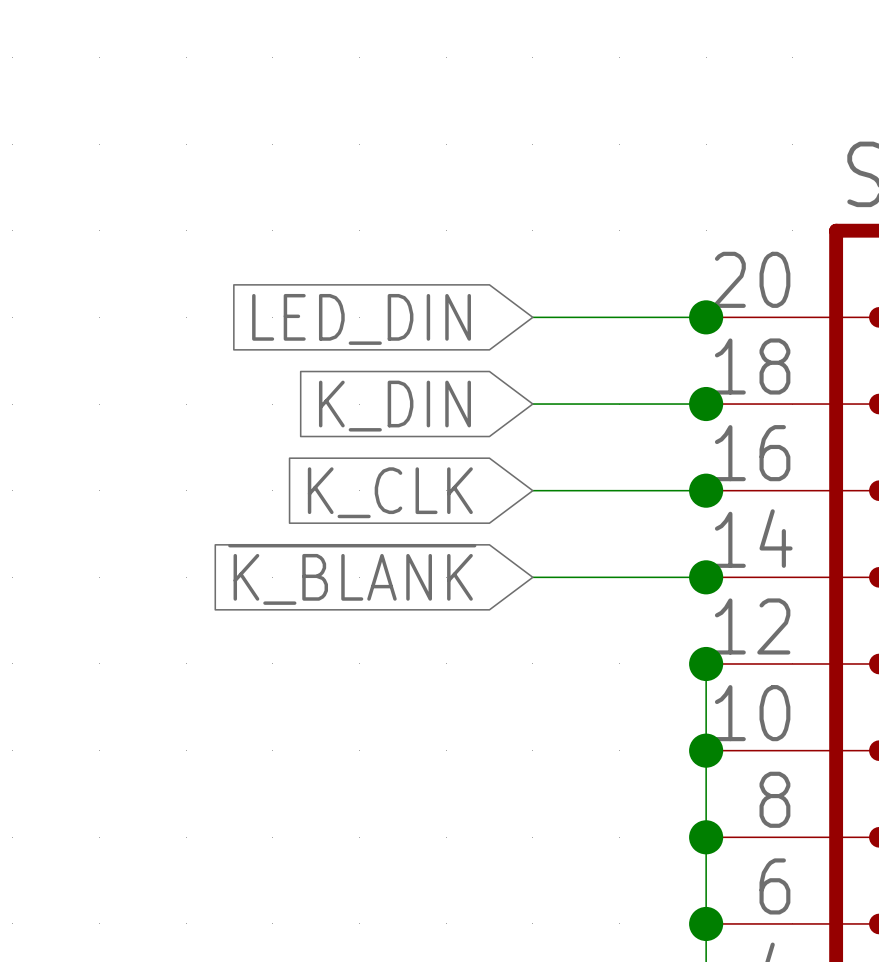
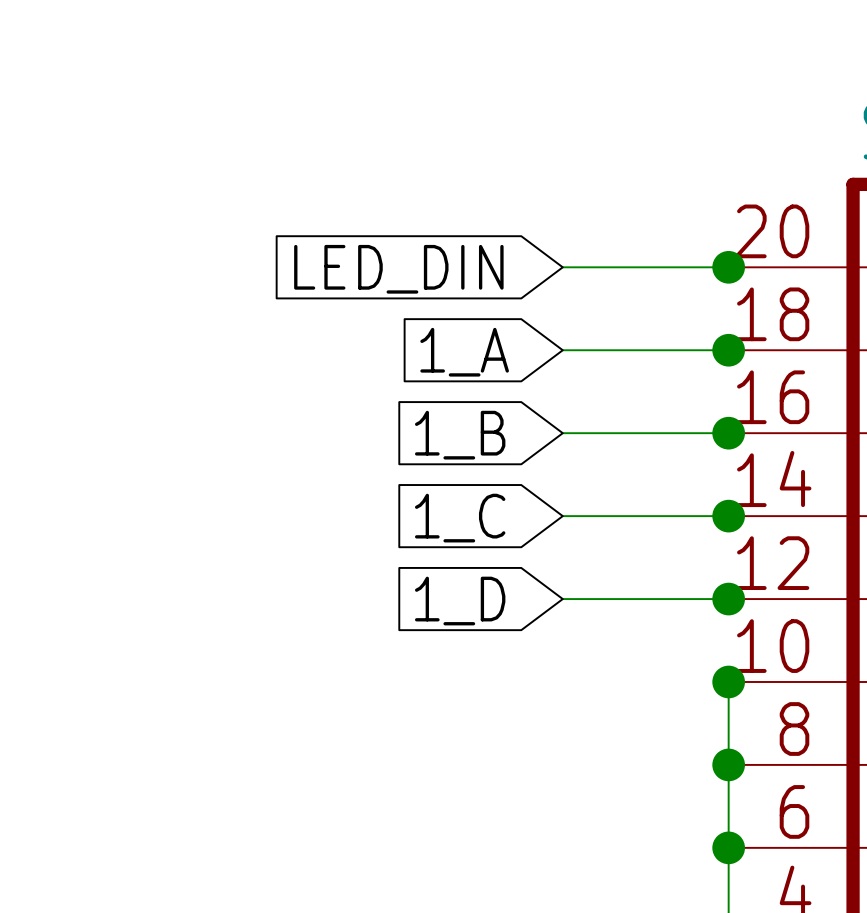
global label: K_DIN (394, 406) -> 1_A (464, 352)
global label: K_CLK (390, 492) -> 1_B (460, 435)
global label: ~{K_BLANK} (352, 574) -> 1_C (460, 518)
wire: (706, 663) (706, 750) -> (728, 599) (562, 599)
global label: none -> 1_D (460, 601)

